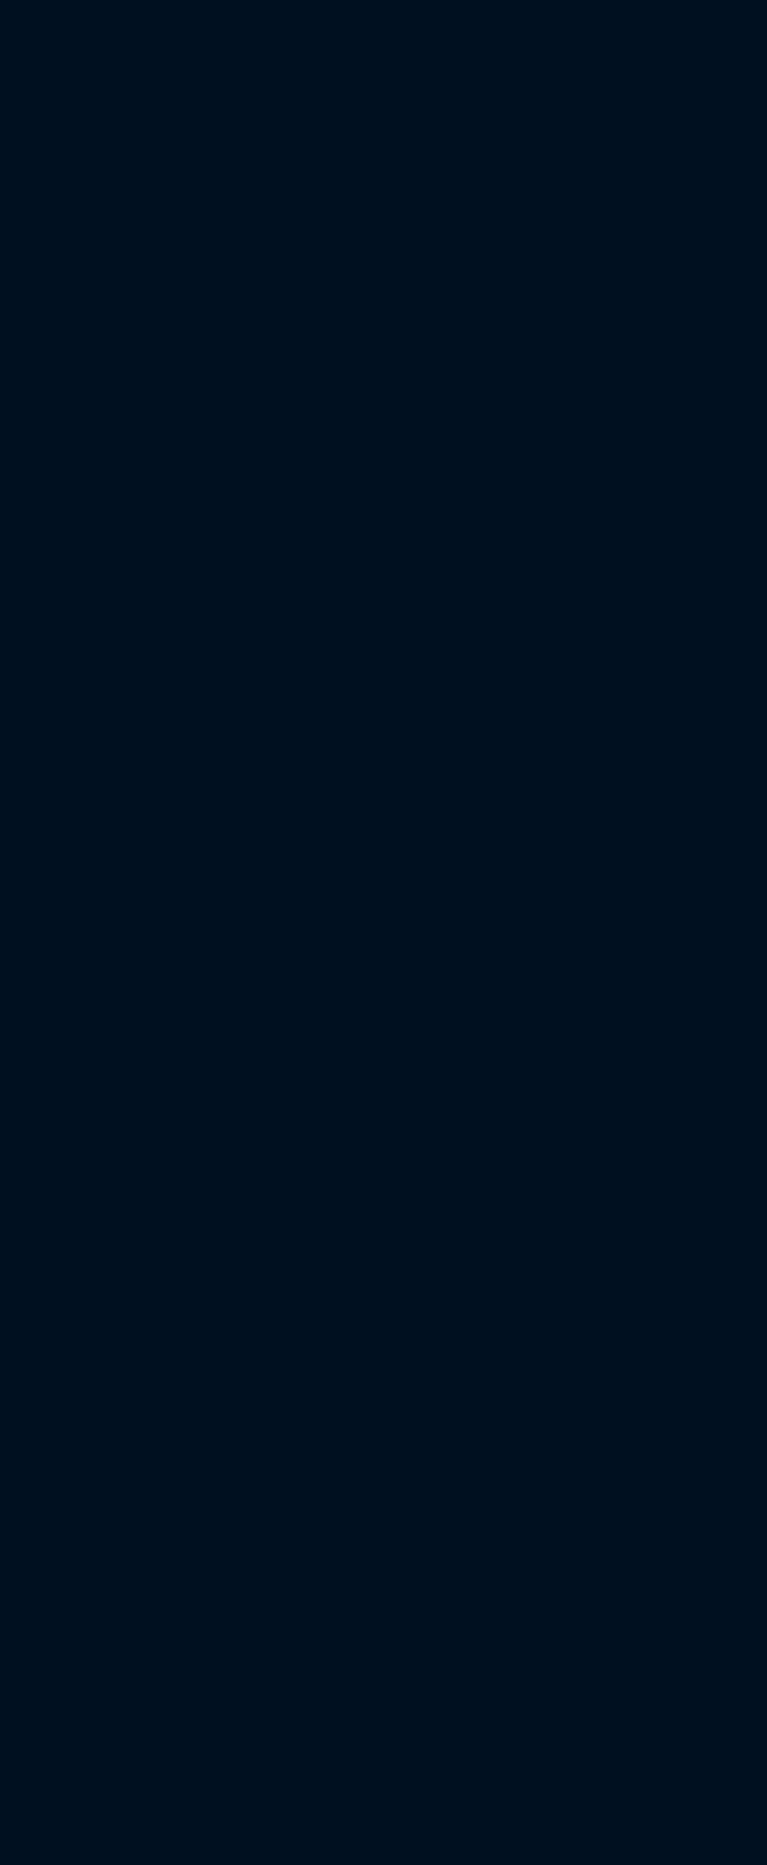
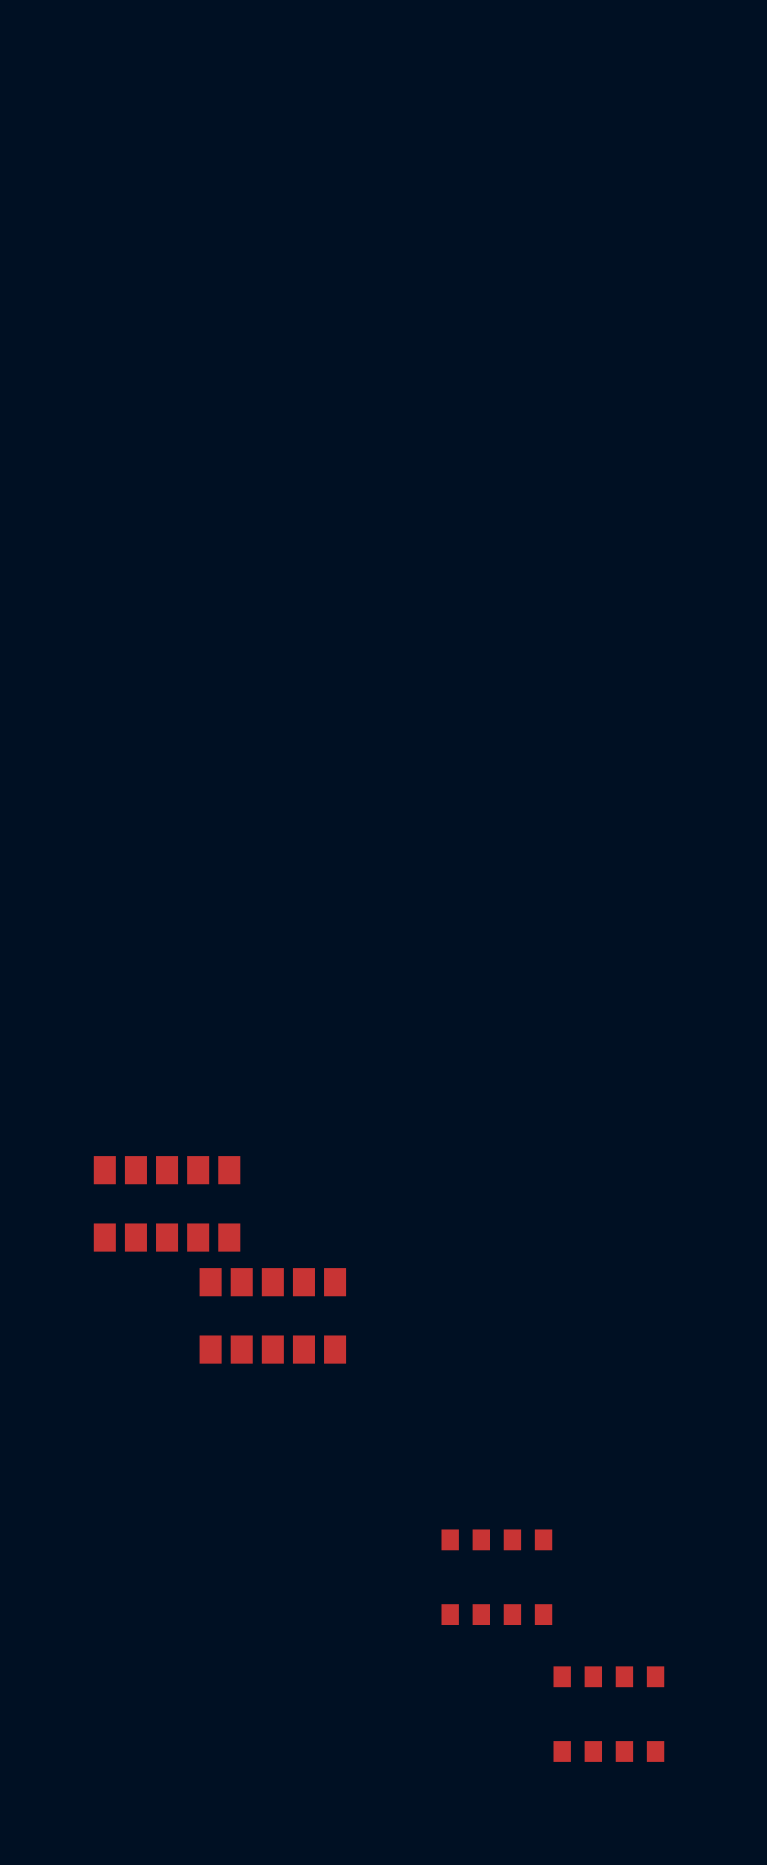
part: none -> (167, 1203)
part: none -> (272, 1315)
part: none -> (496, 1577)
part: none -> (608, 1714)

